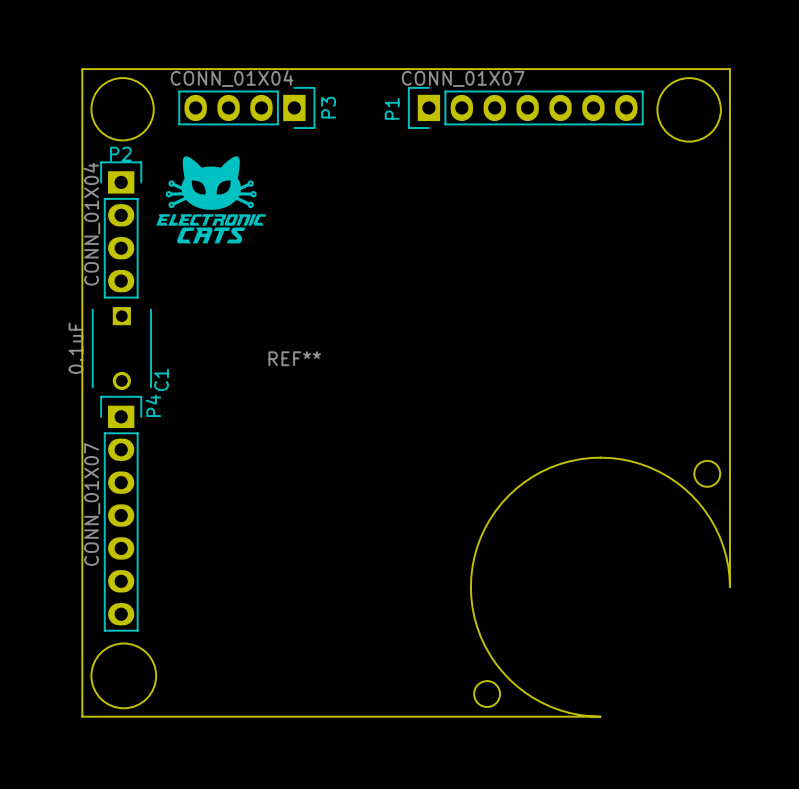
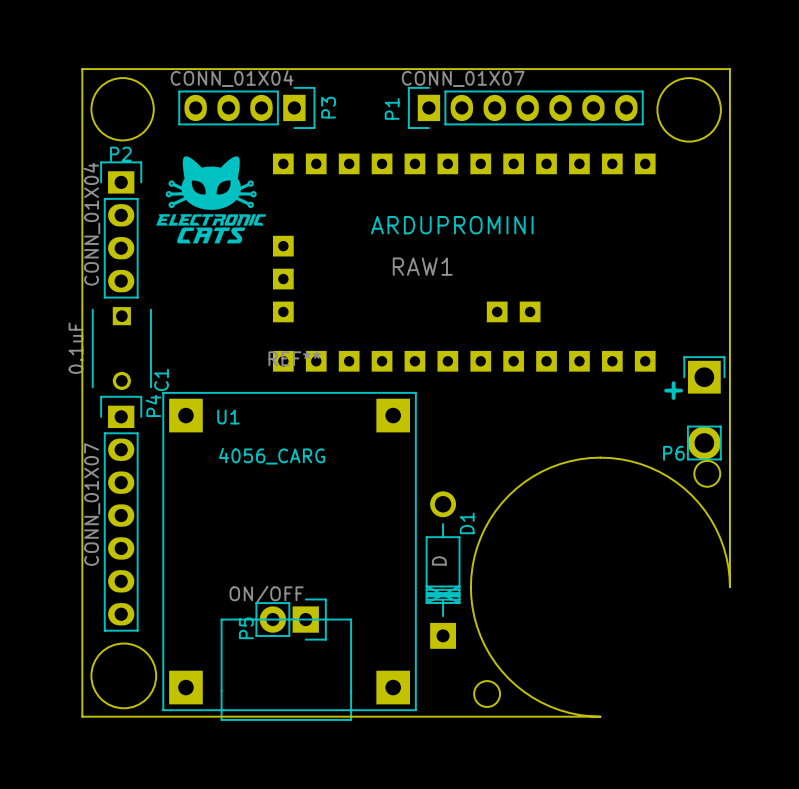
RAW1: none -> ARDUPROMINI (464, 262)
text: none -> + (673, 390)
P6: none -> (704, 408)
U1: none -> 4056_CARG (289, 556)
D1: none -> D (443, 570)
P5: none -> ON/OFF (291, 619)

